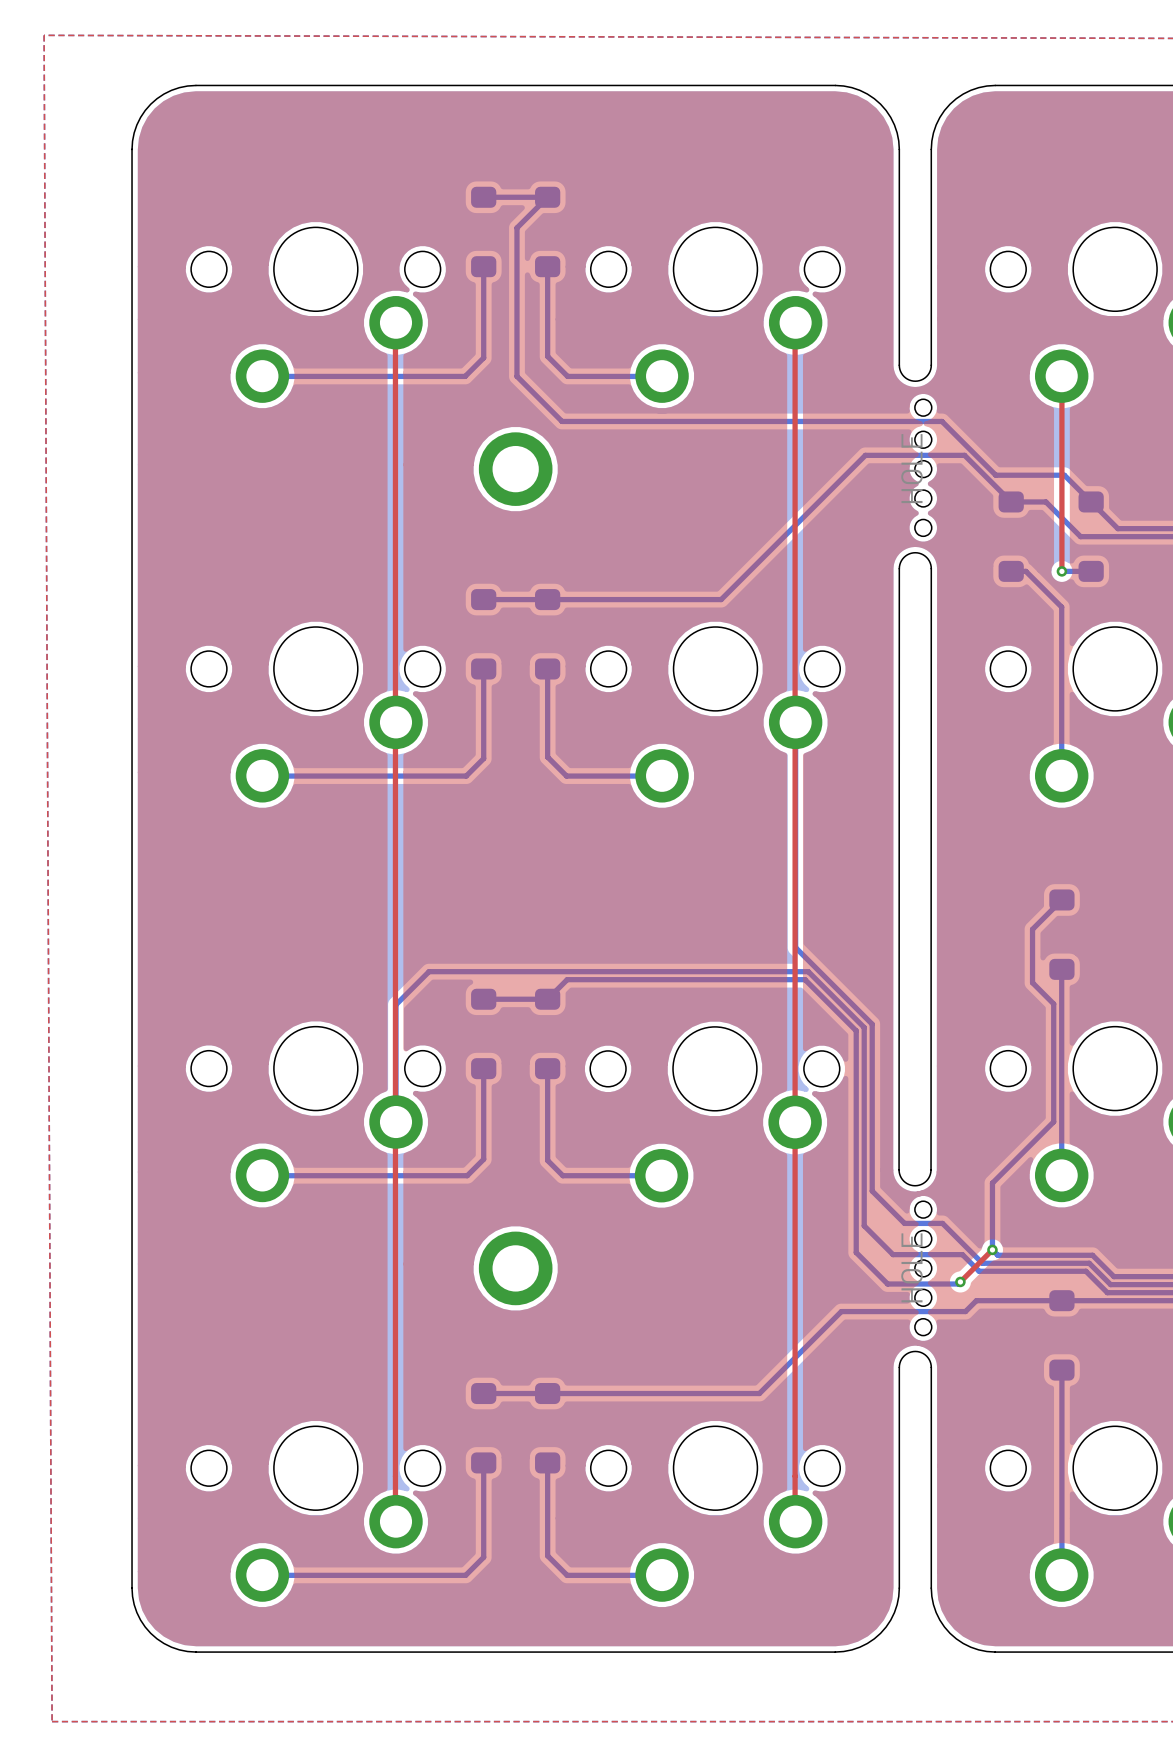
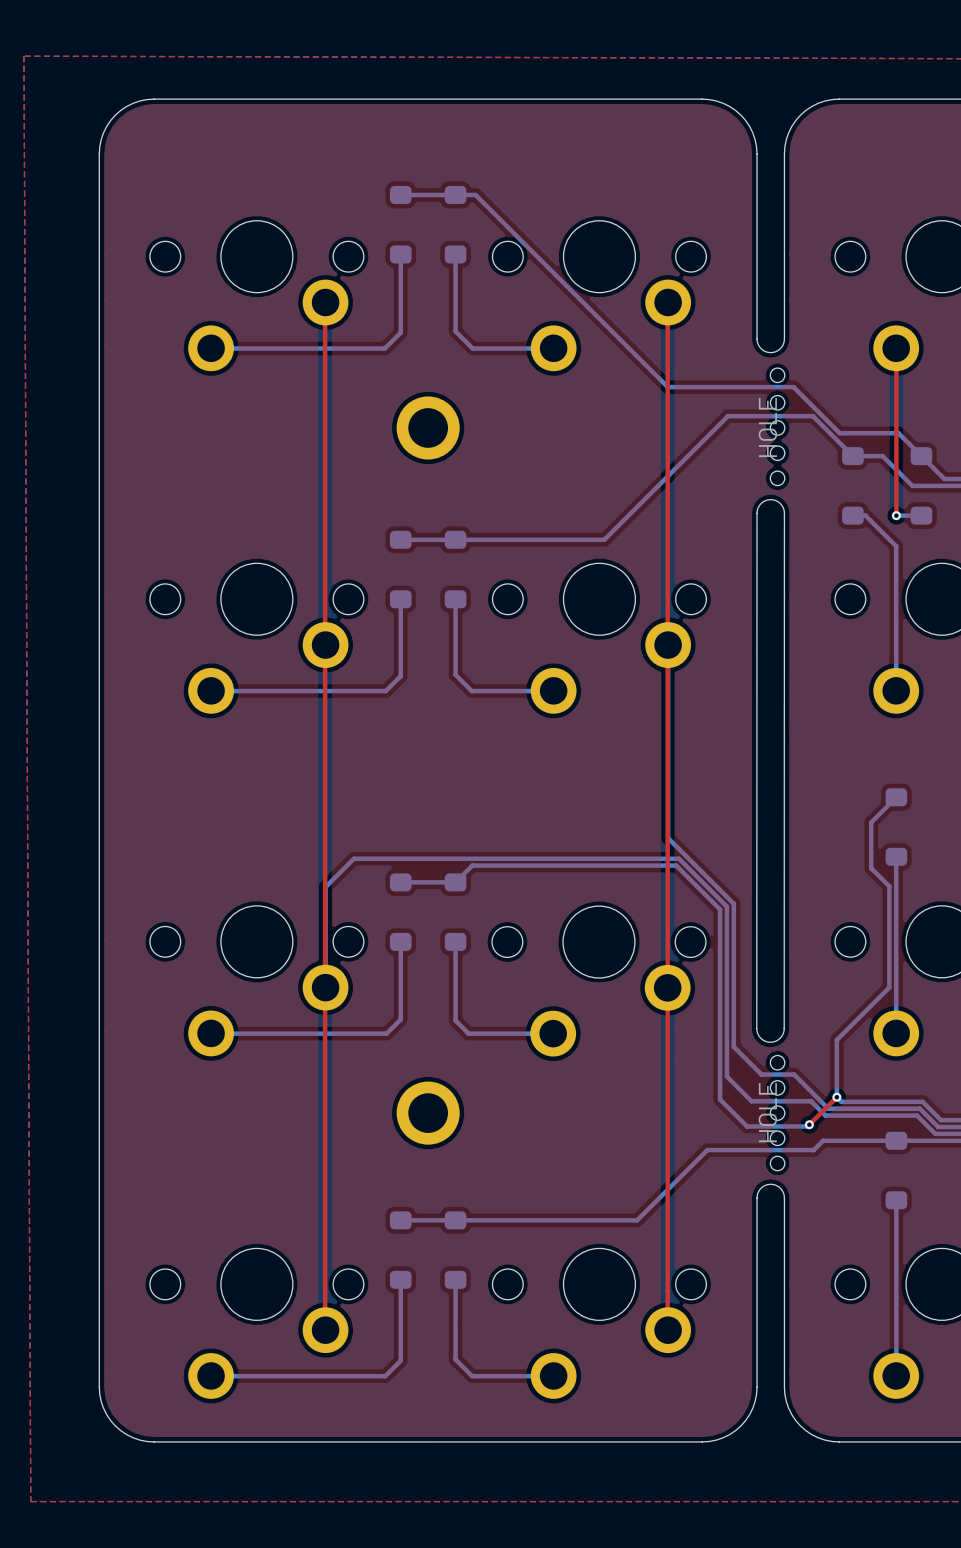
bottom track: (547, 197) (516, 227) (516, 376) (562, 421) (795, 421) -> (455, 194) (475, 194) (667, 387)

